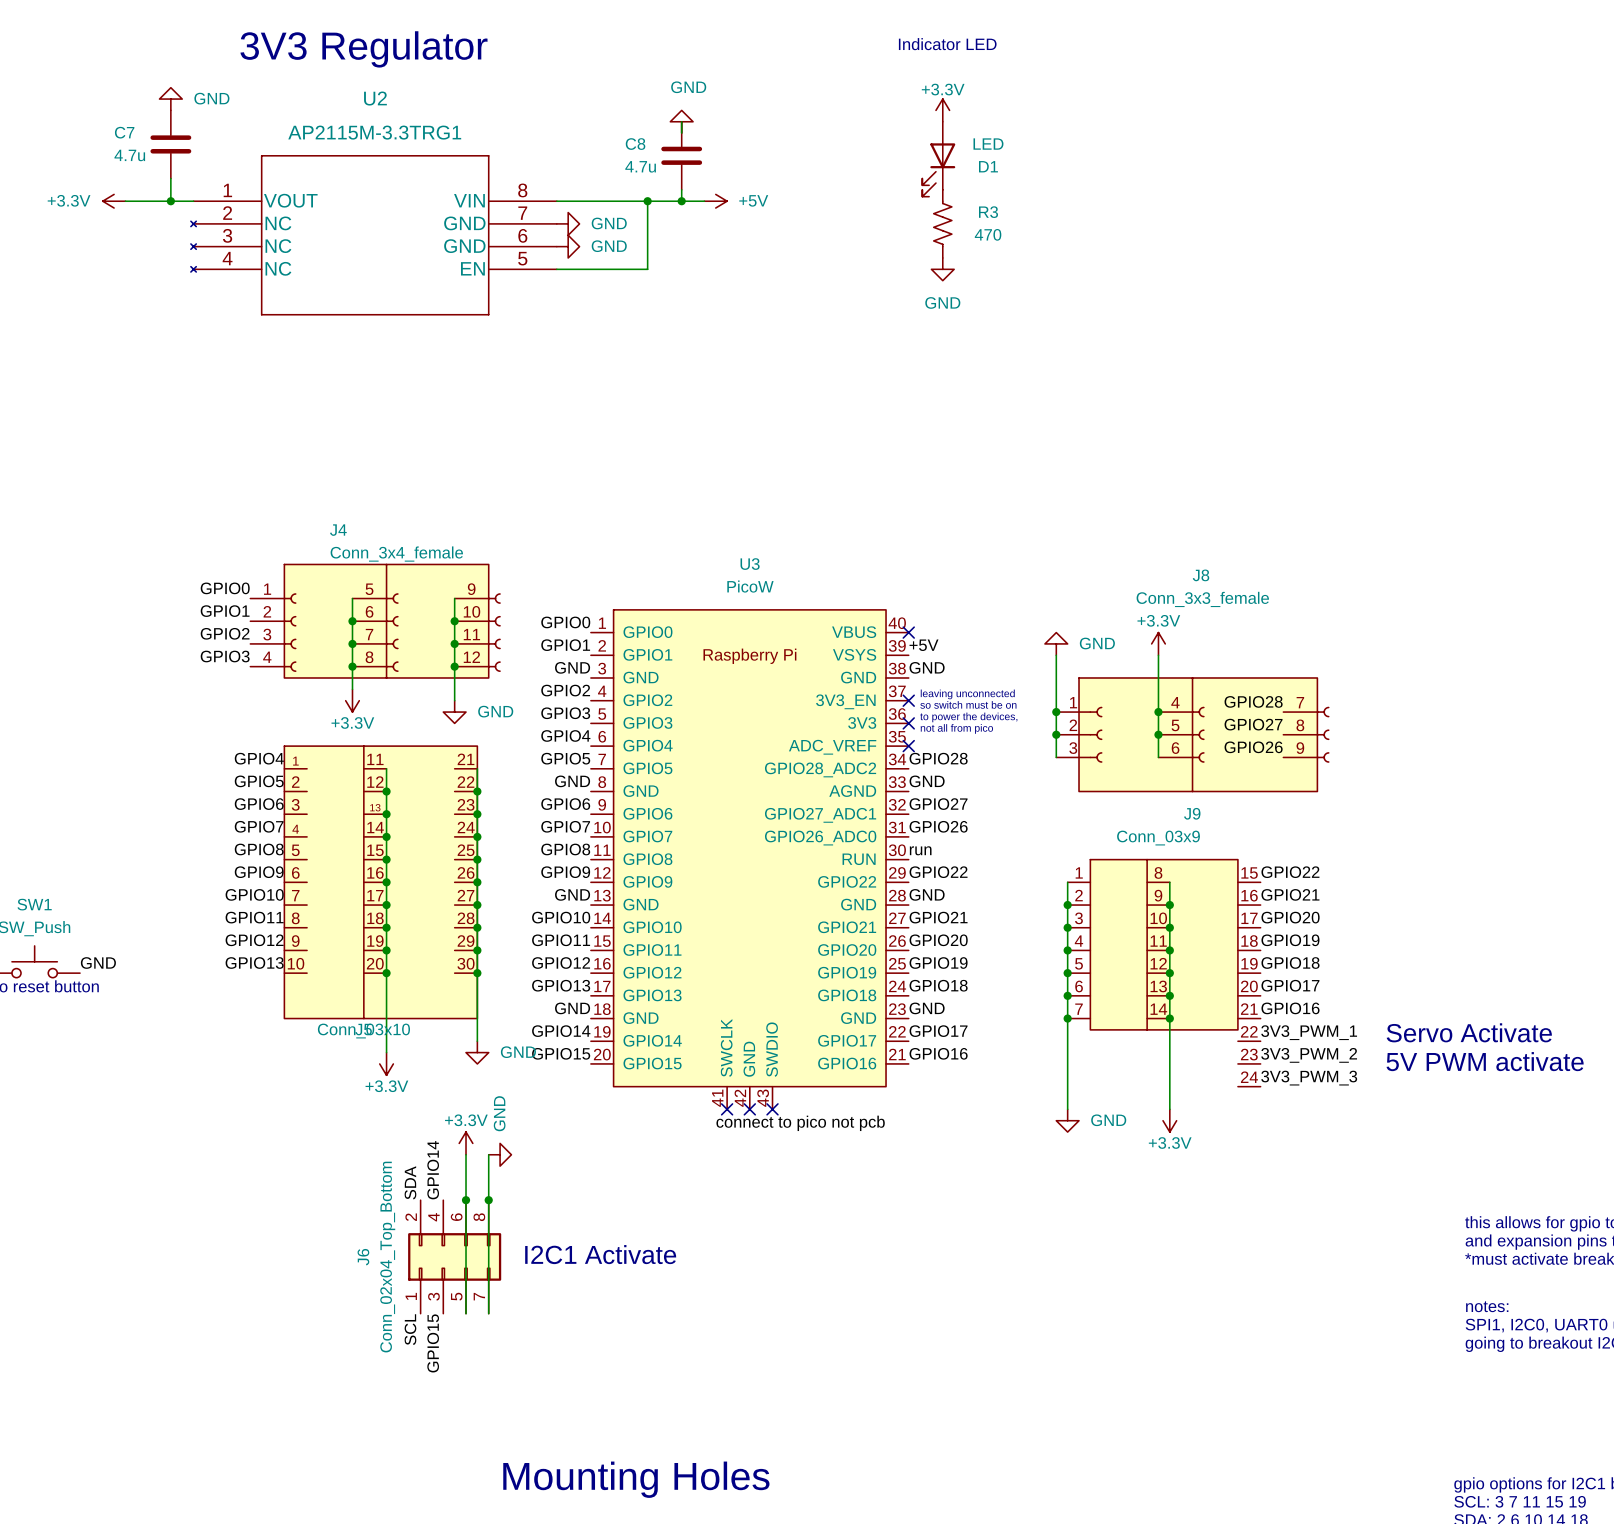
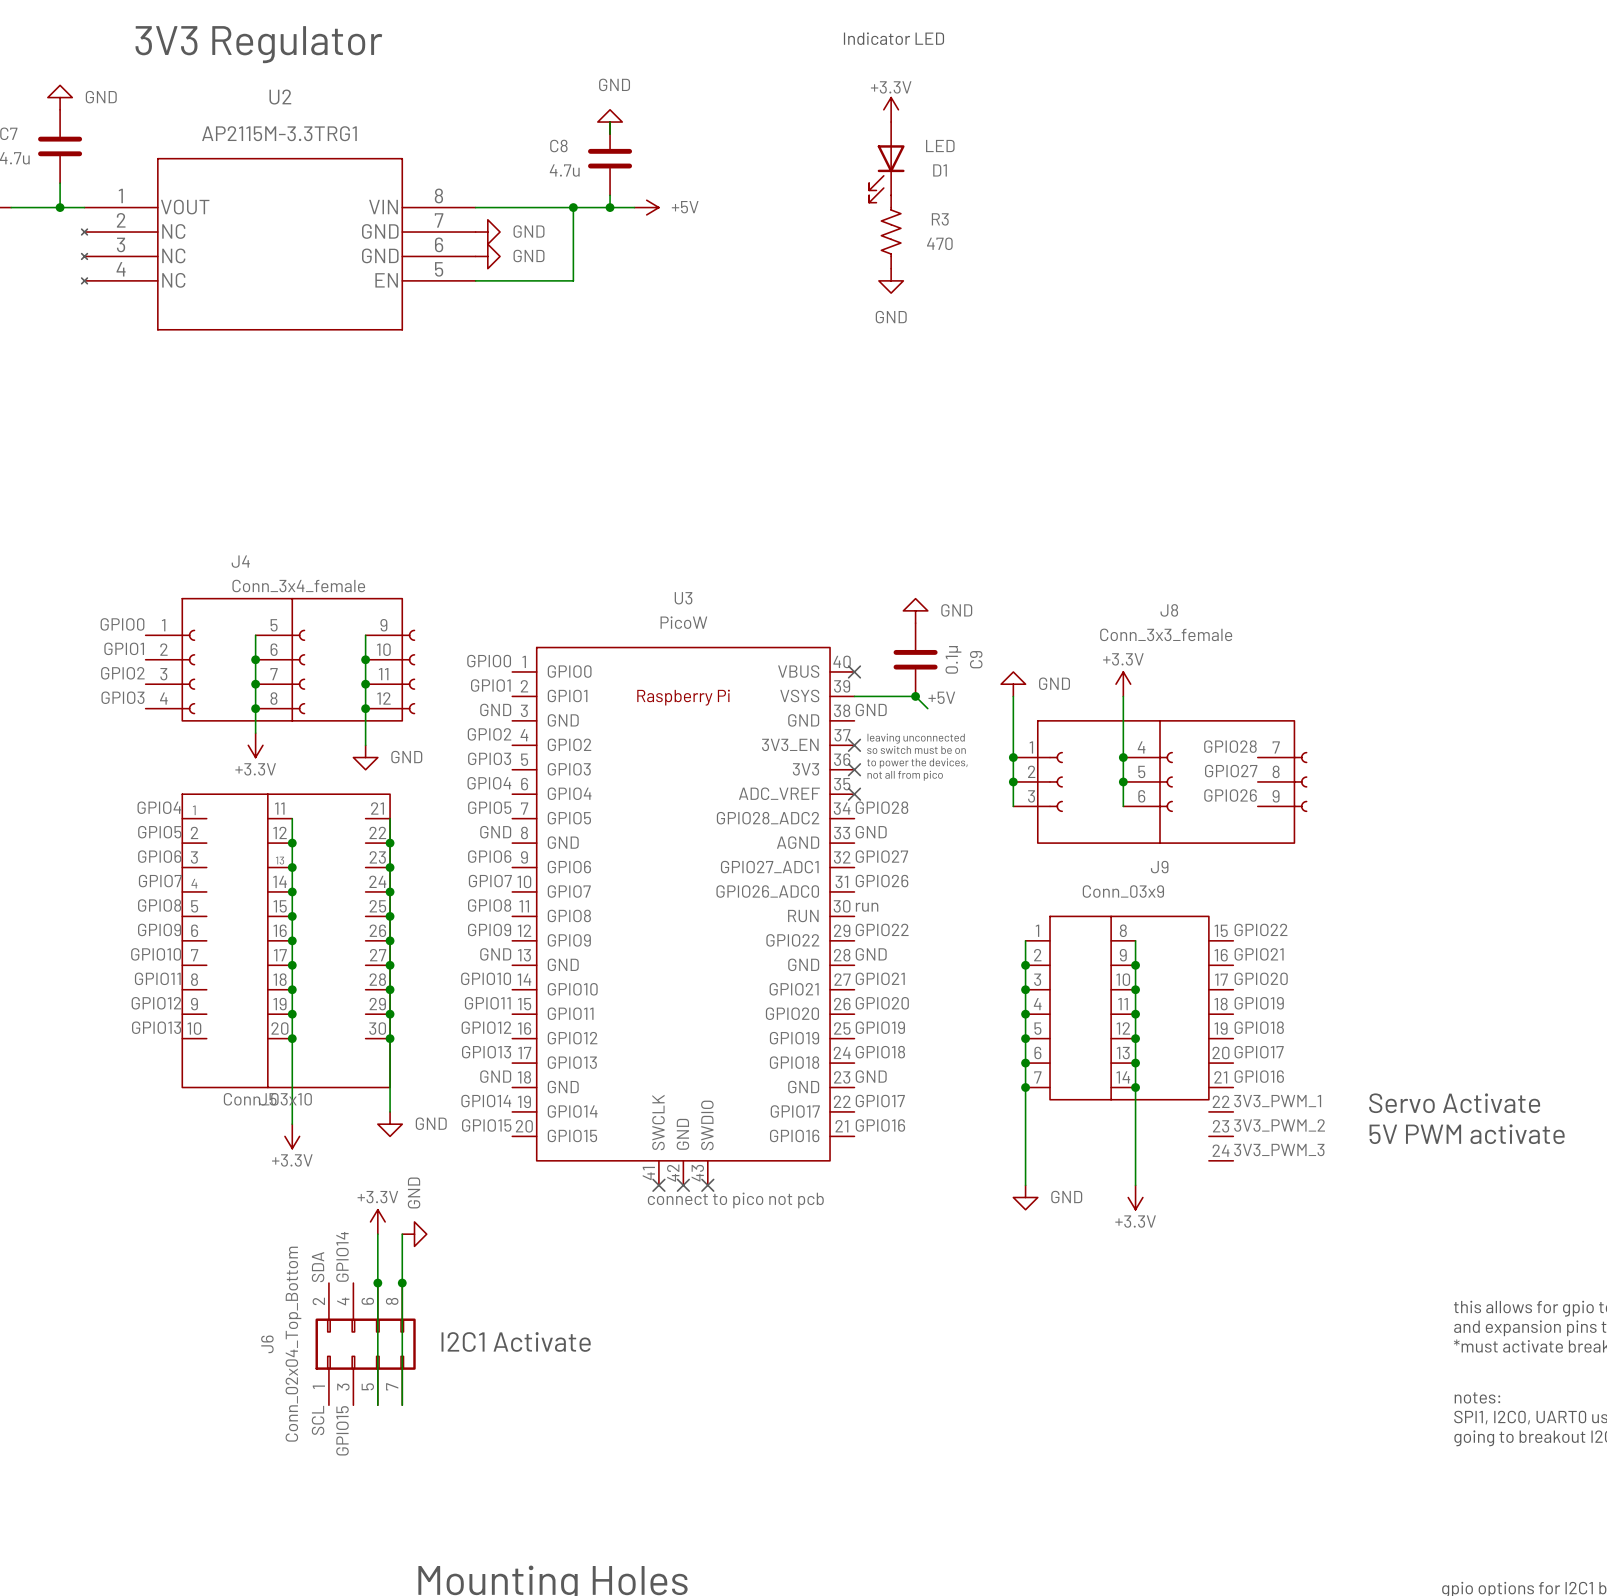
power symbol: none -> GND (915, 610)
C9: none -> 0.1μ (915, 659)
label position: +5V (924, 645) -> +5V (941, 697)
wire: none -> (854, 696) (915, 696) (927, 708)
junction: none -> (915, 696)

